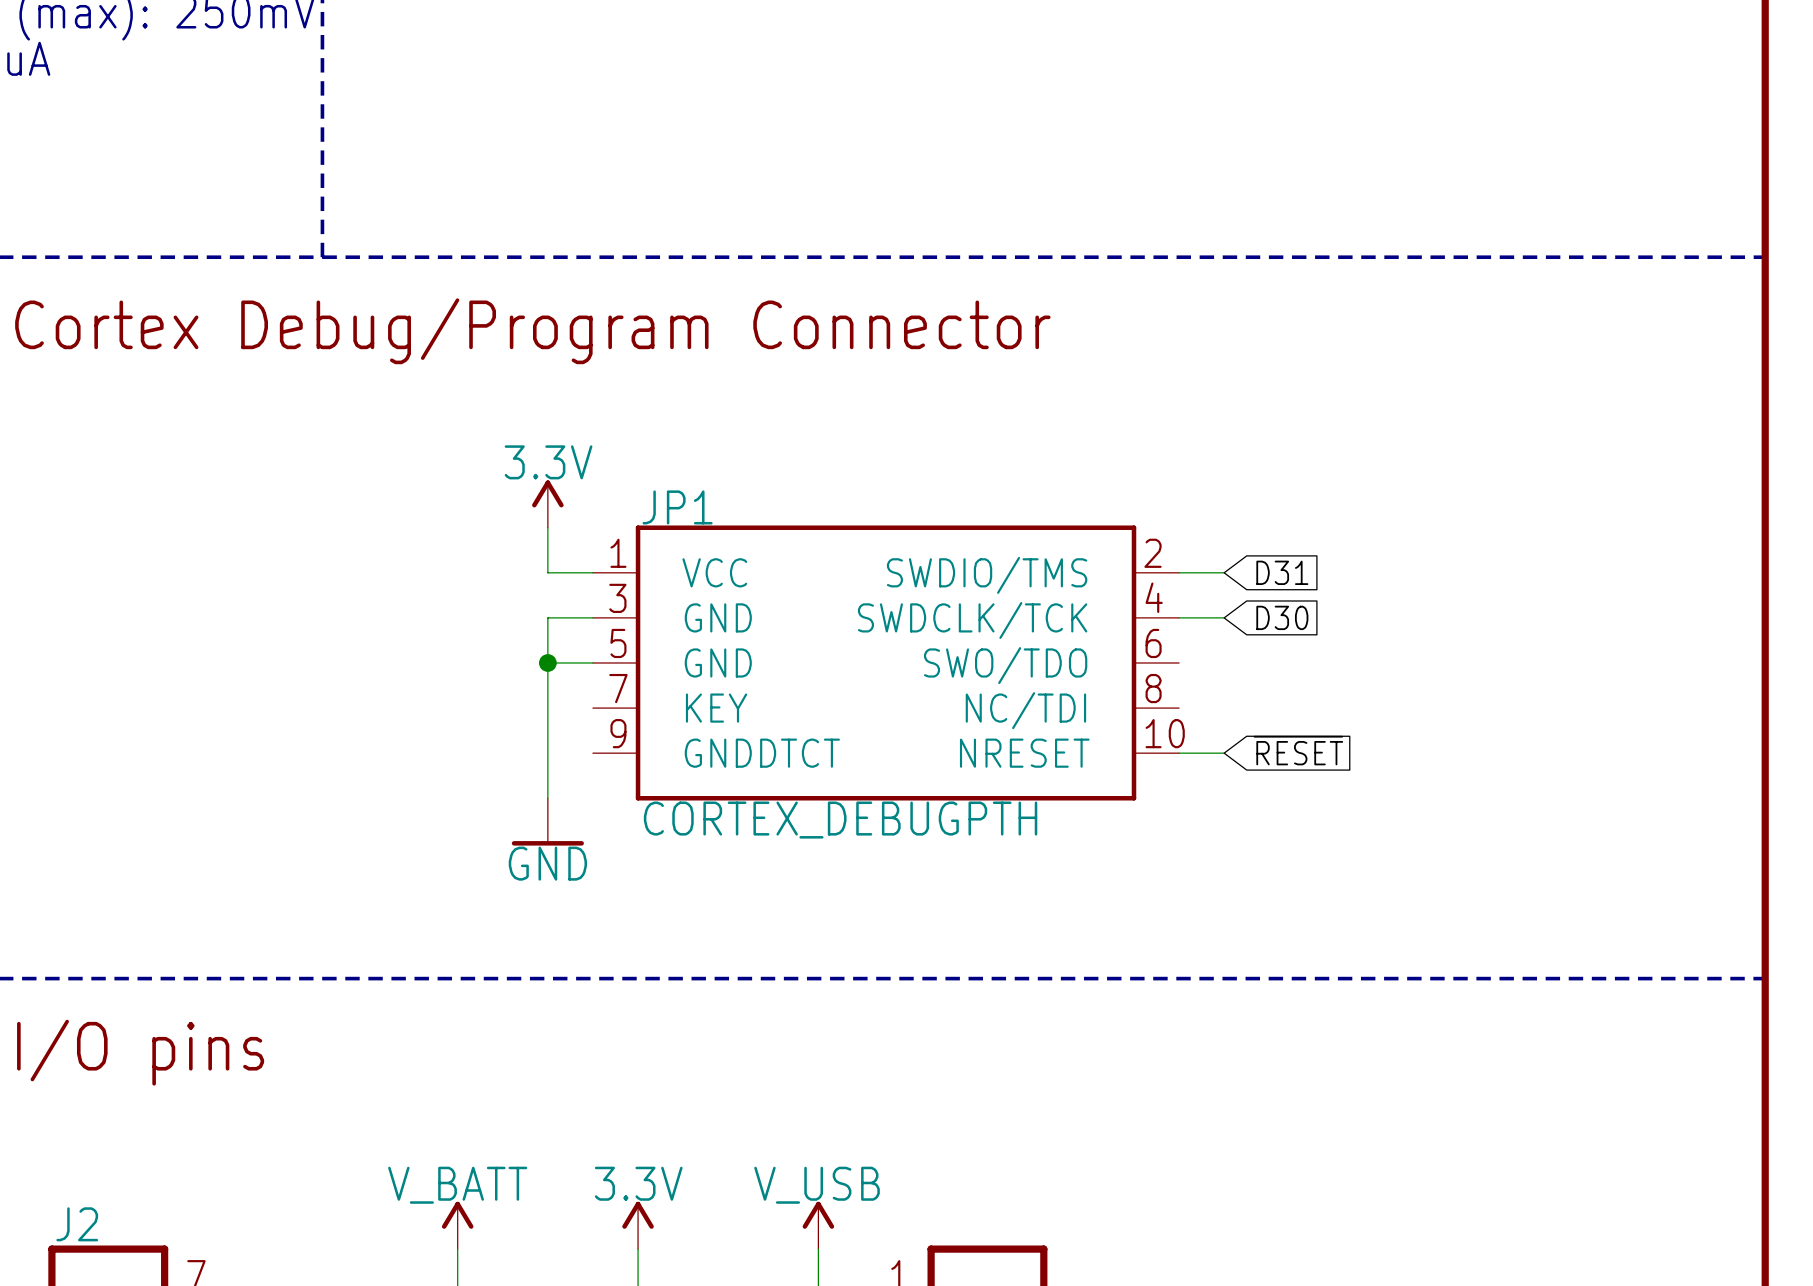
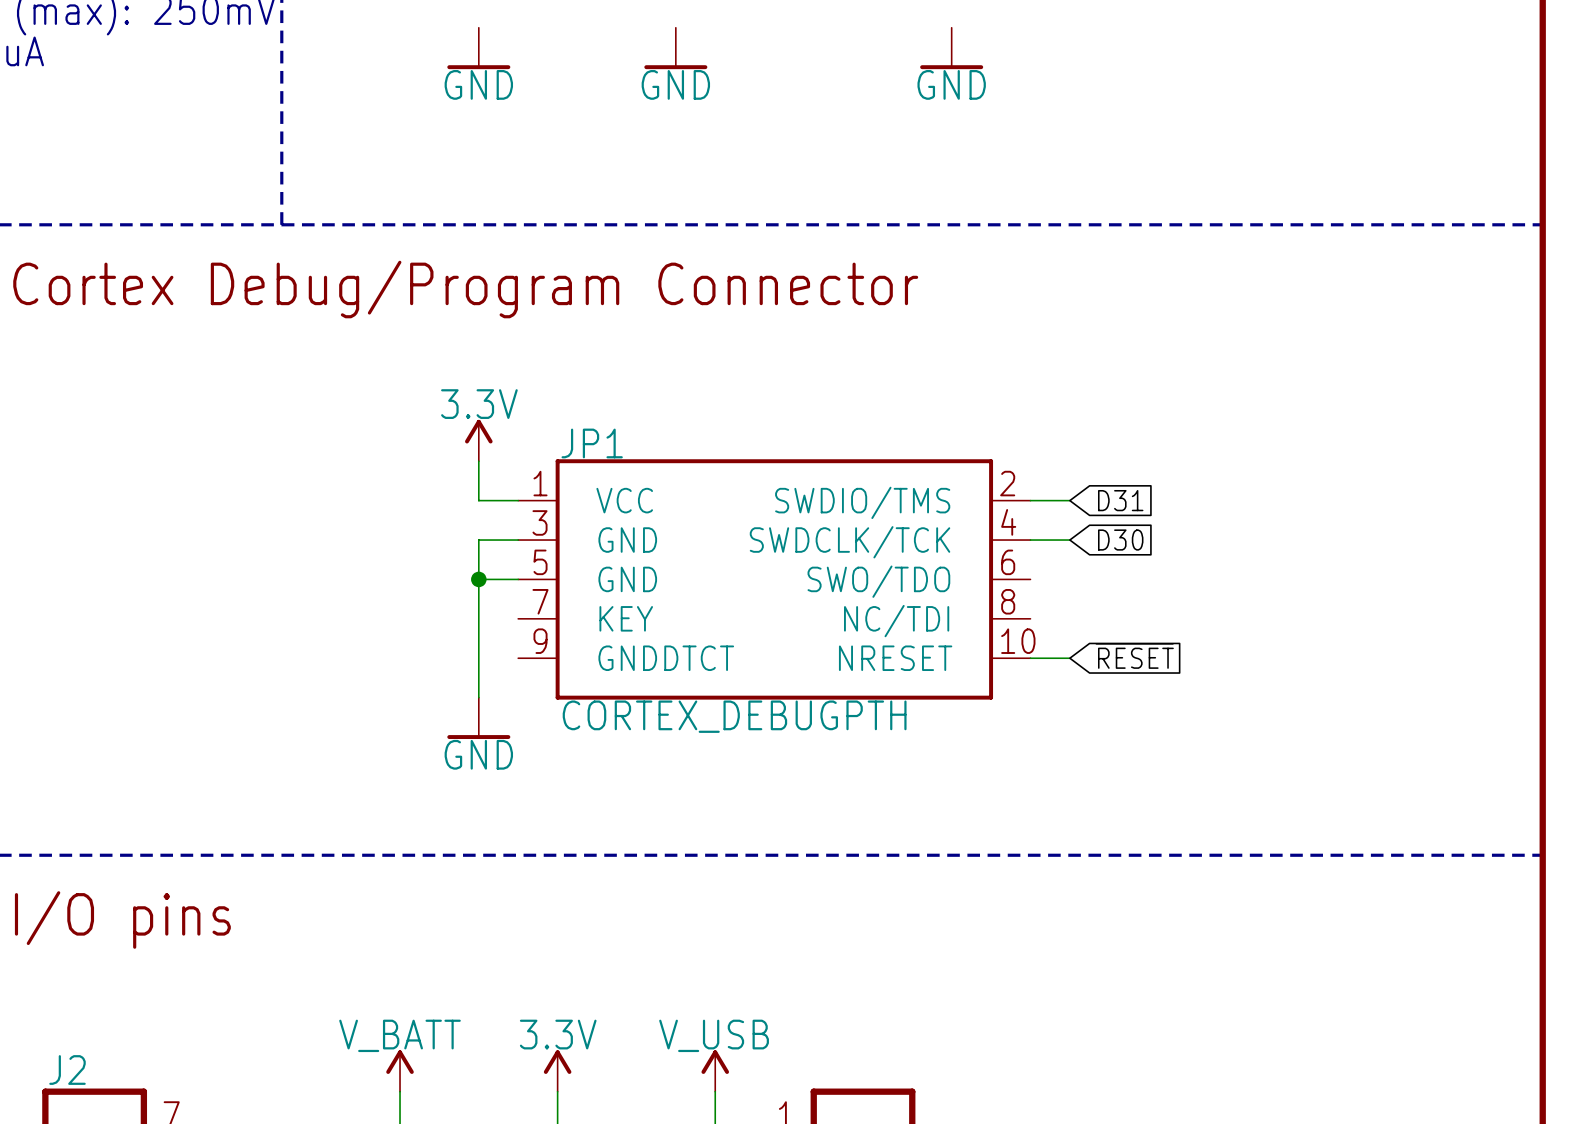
power symbol: none -> GND (478, 48)
power symbol: none -> GND (675, 48)
power symbol: none -> GND (951, 48)

